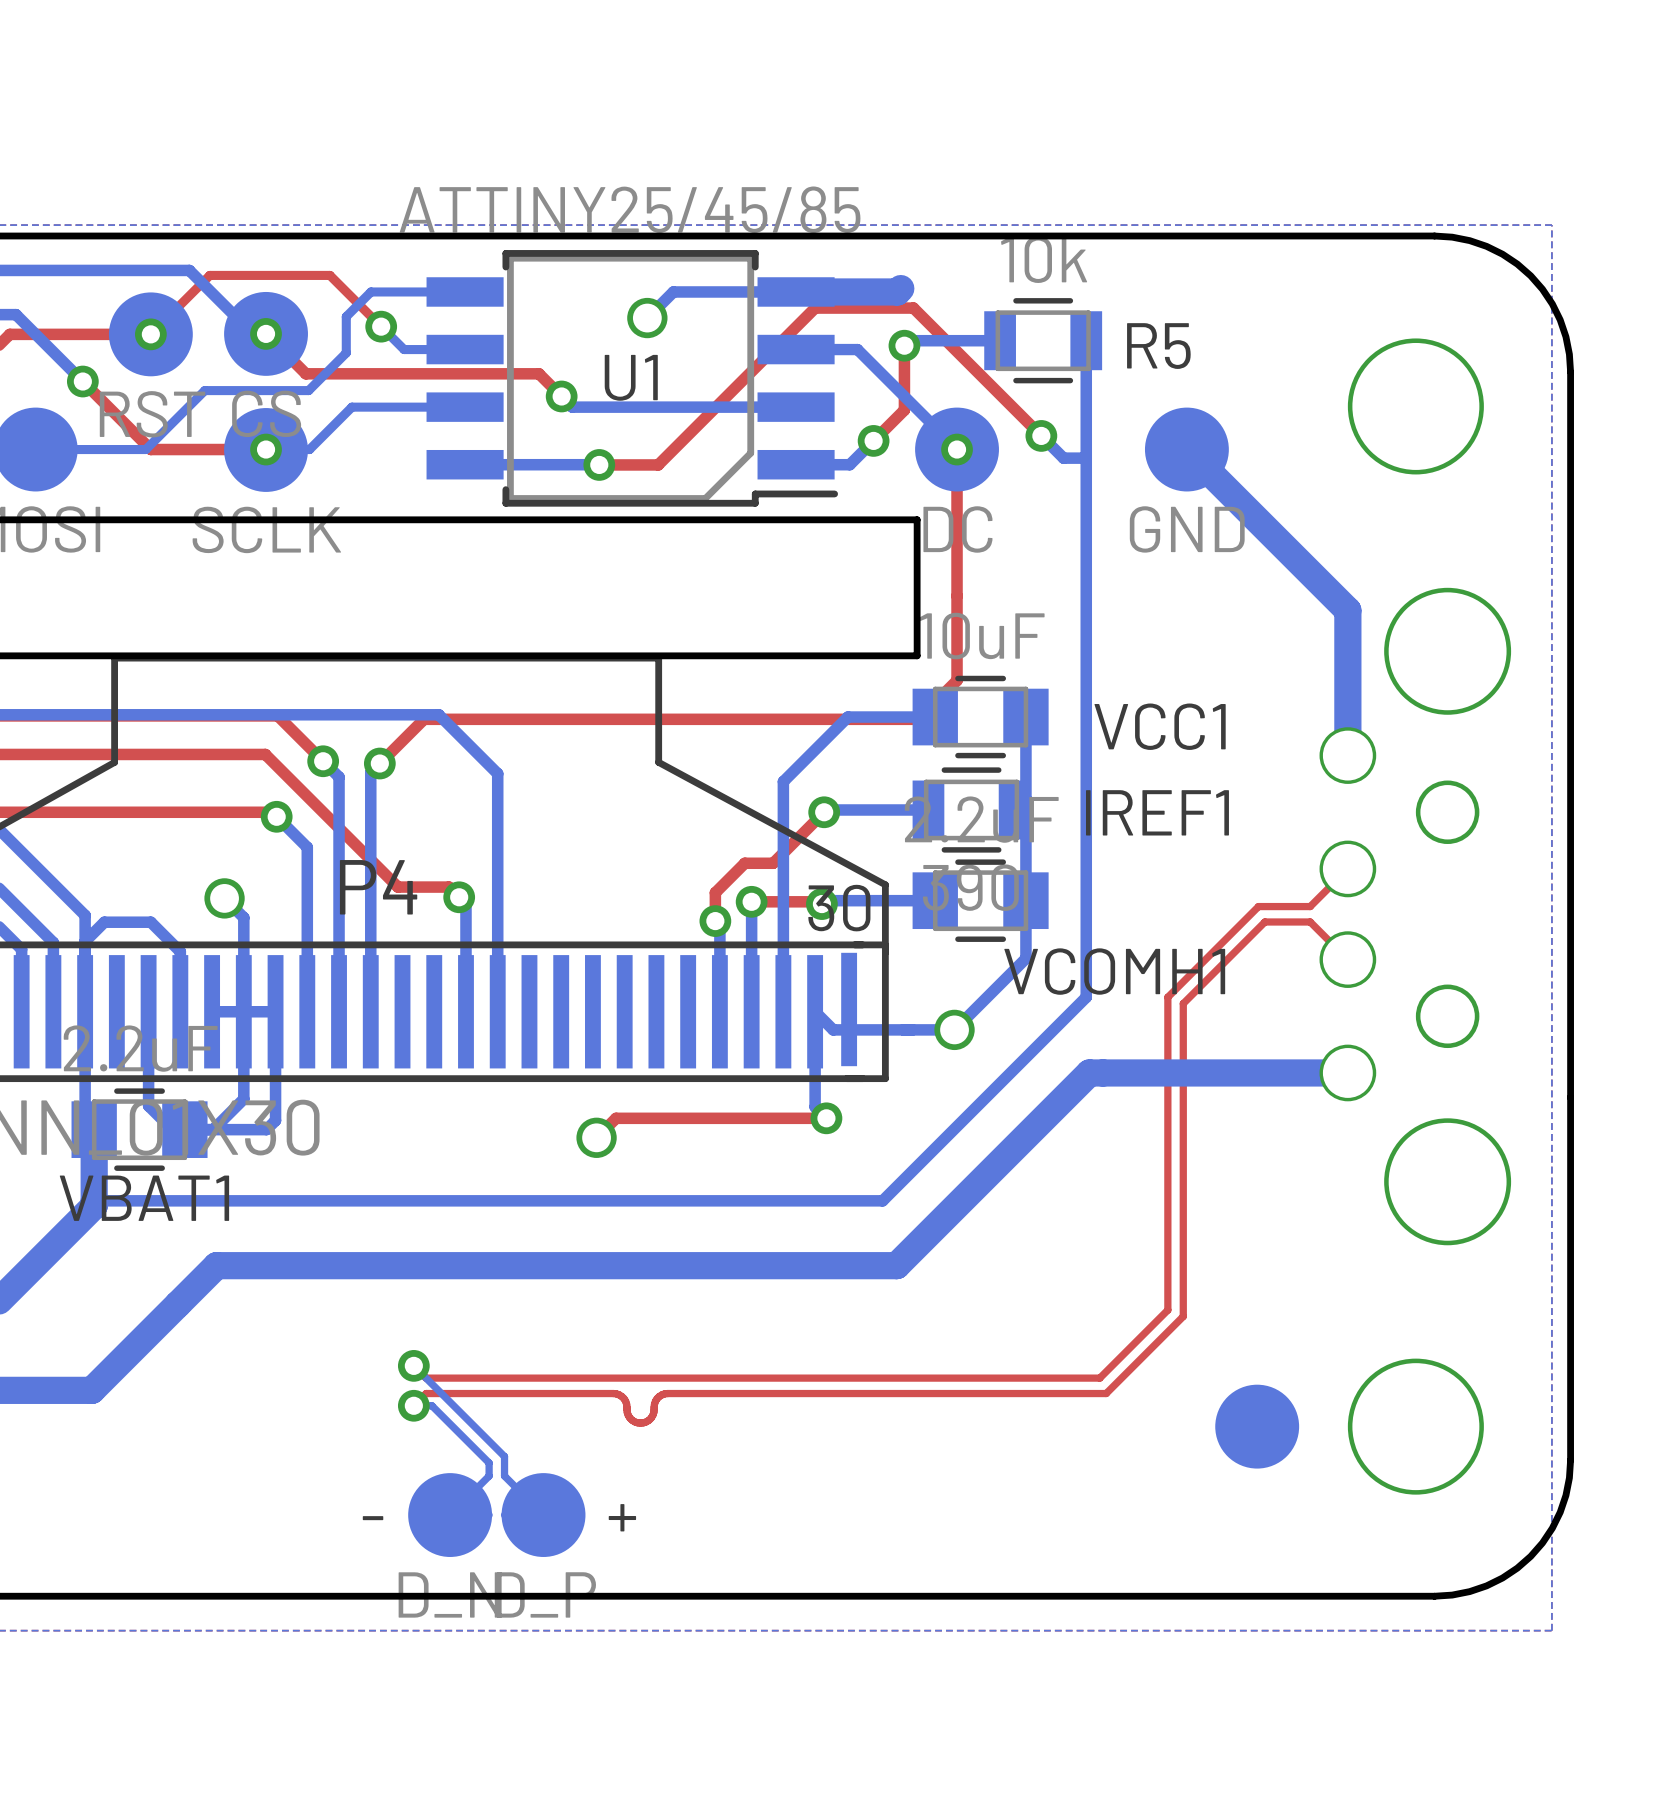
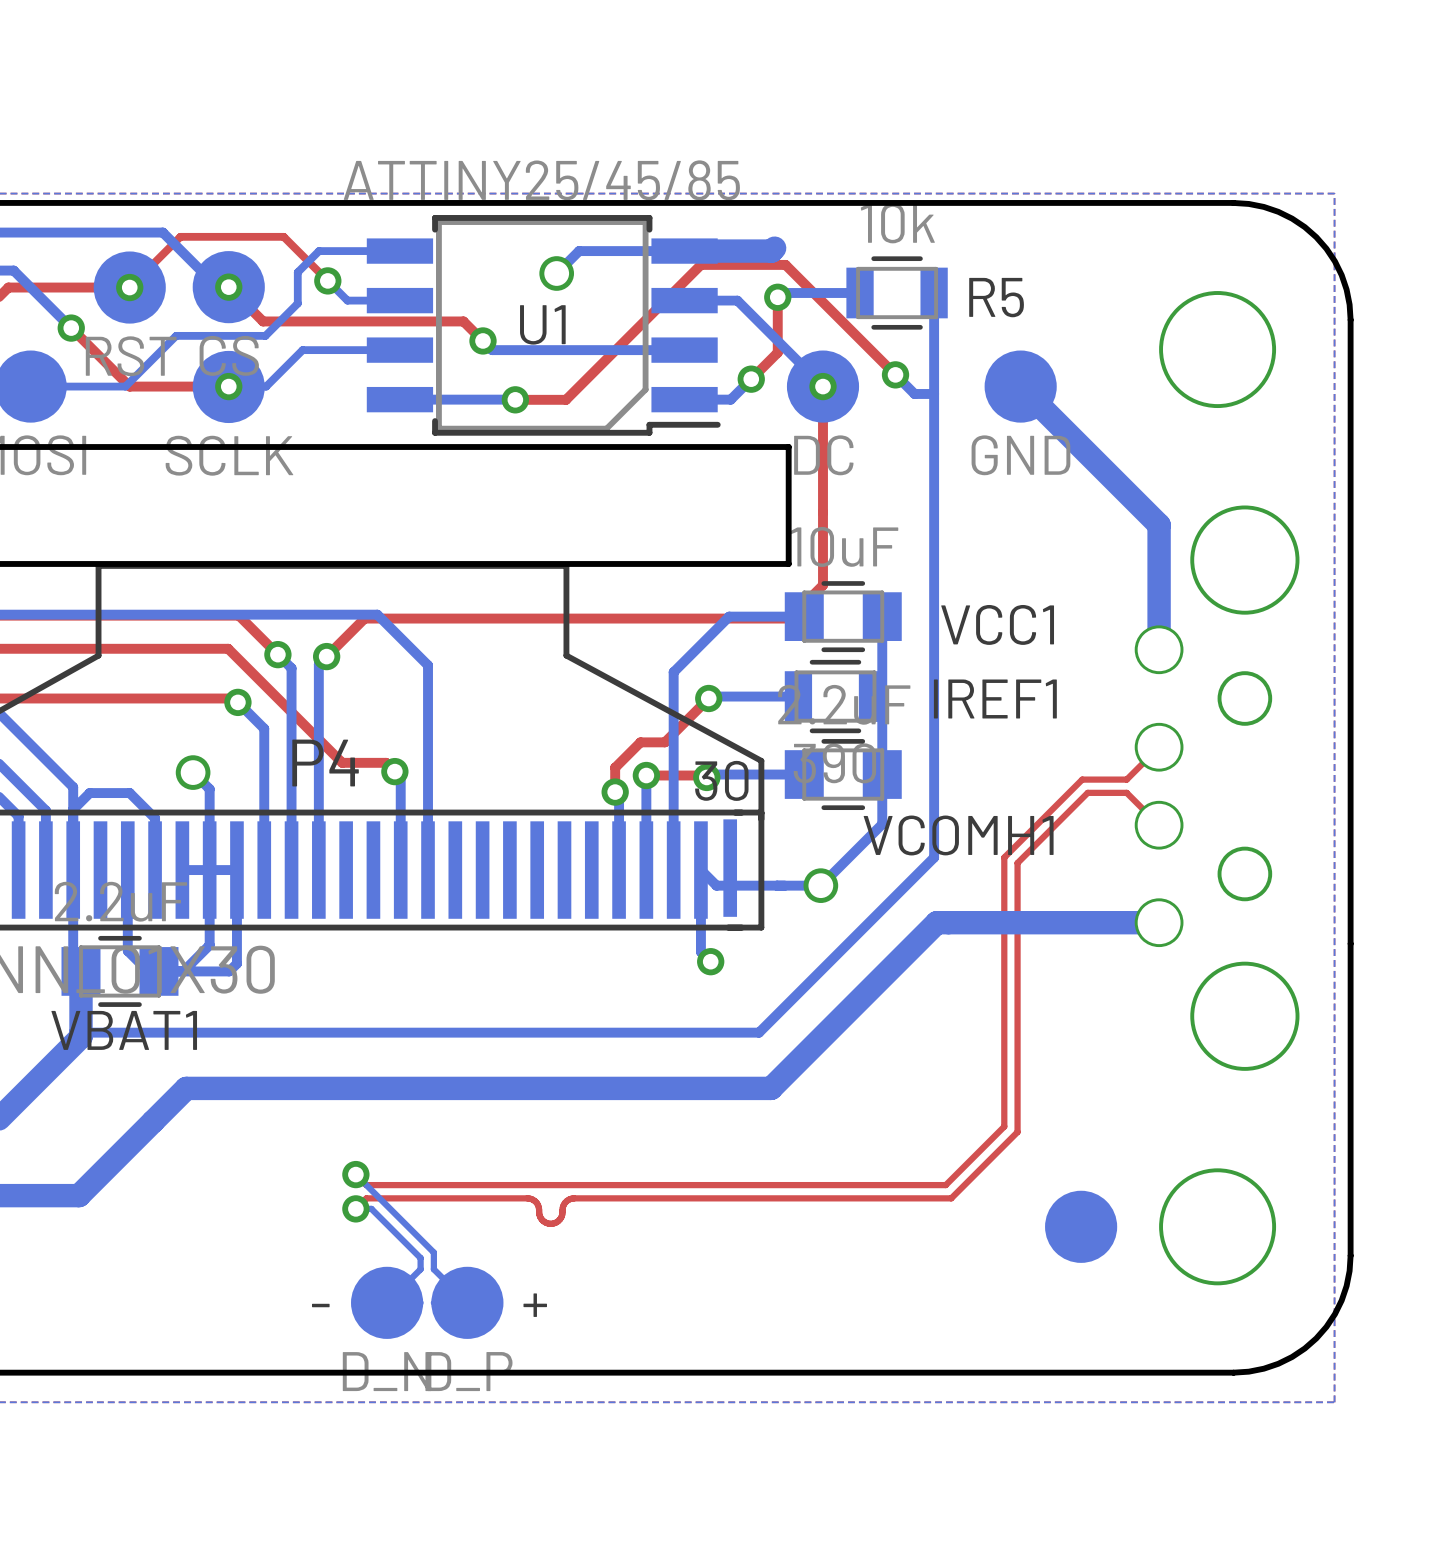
top track: (826, 1118) (616, 1118) (596, 1137) -> none
via: (596, 1137) -> none

